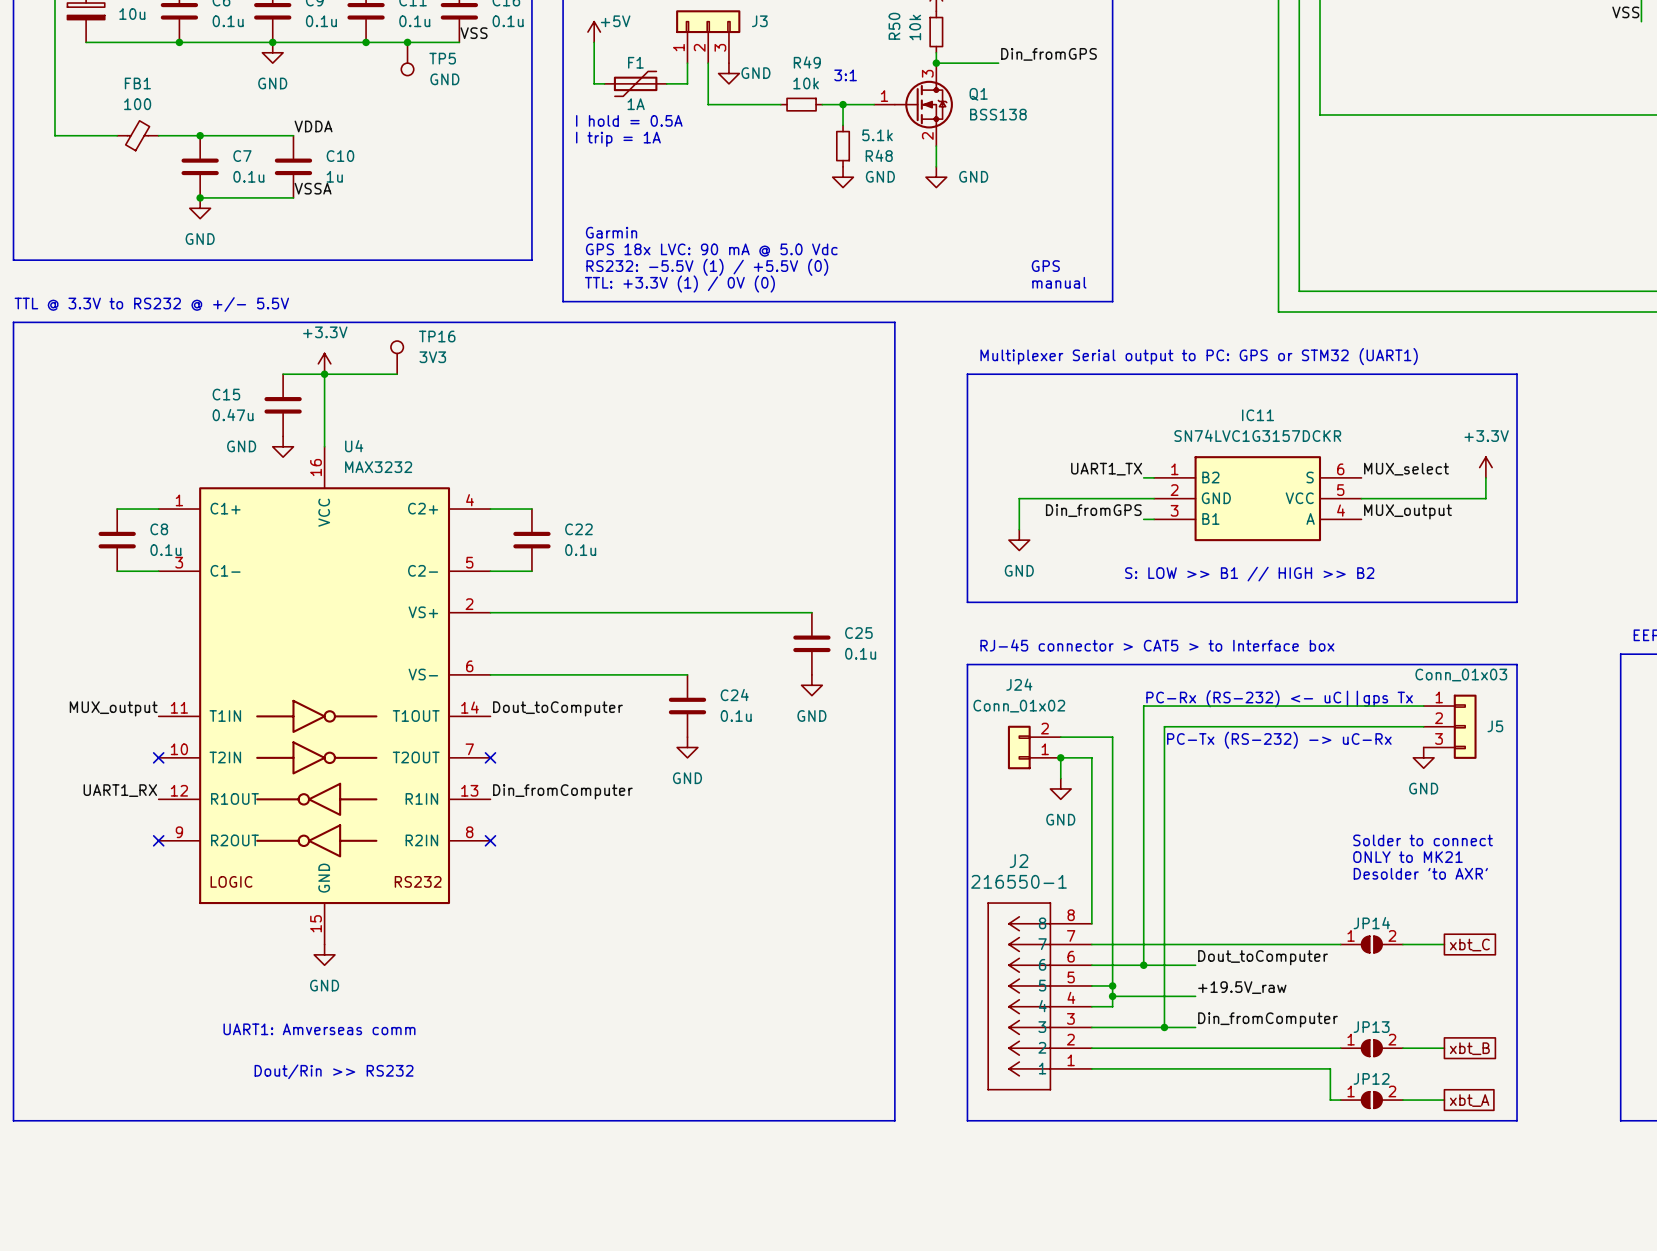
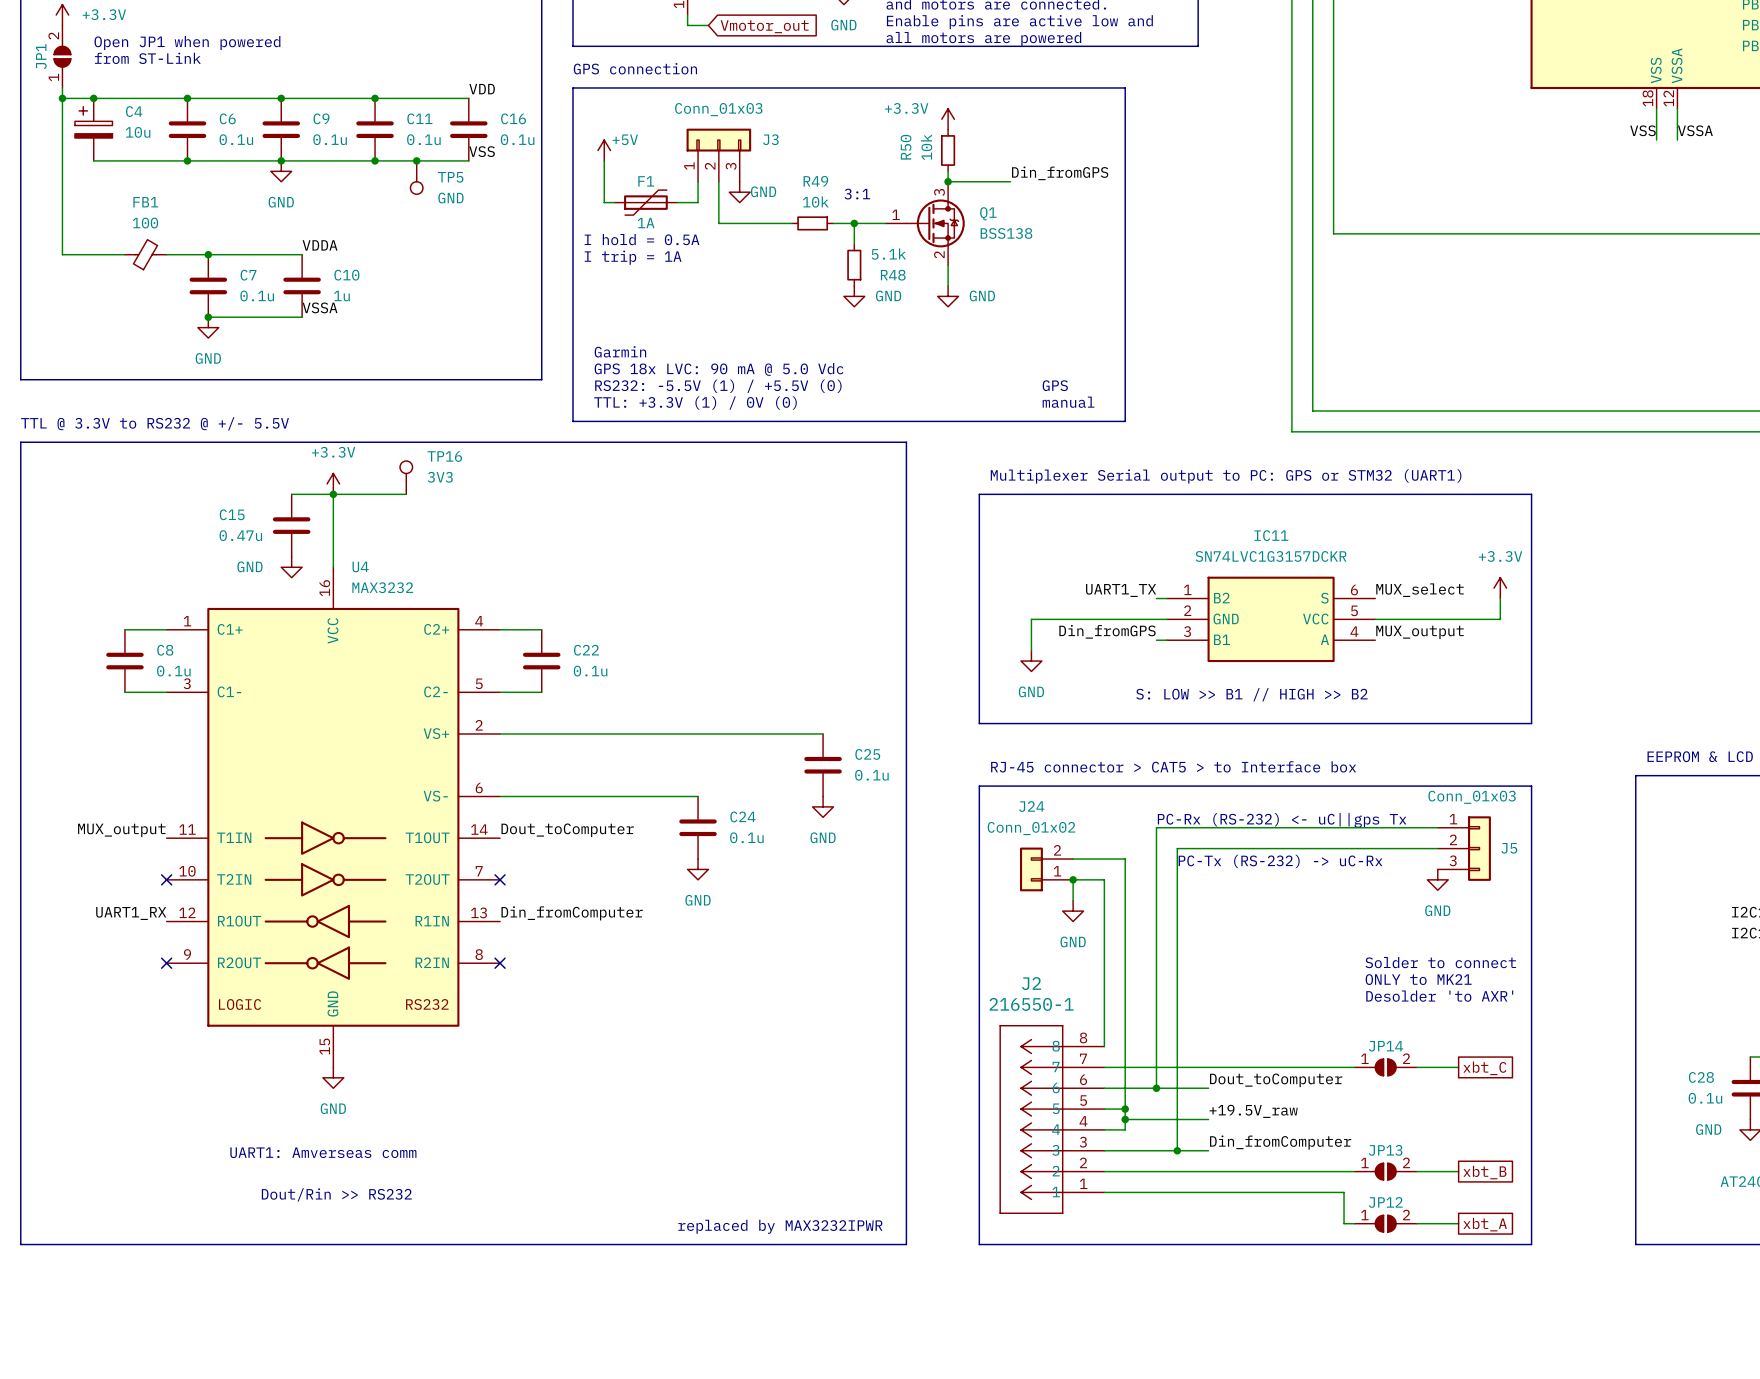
text: none -> replaced by MAX3232IPWR (780, 1226)

